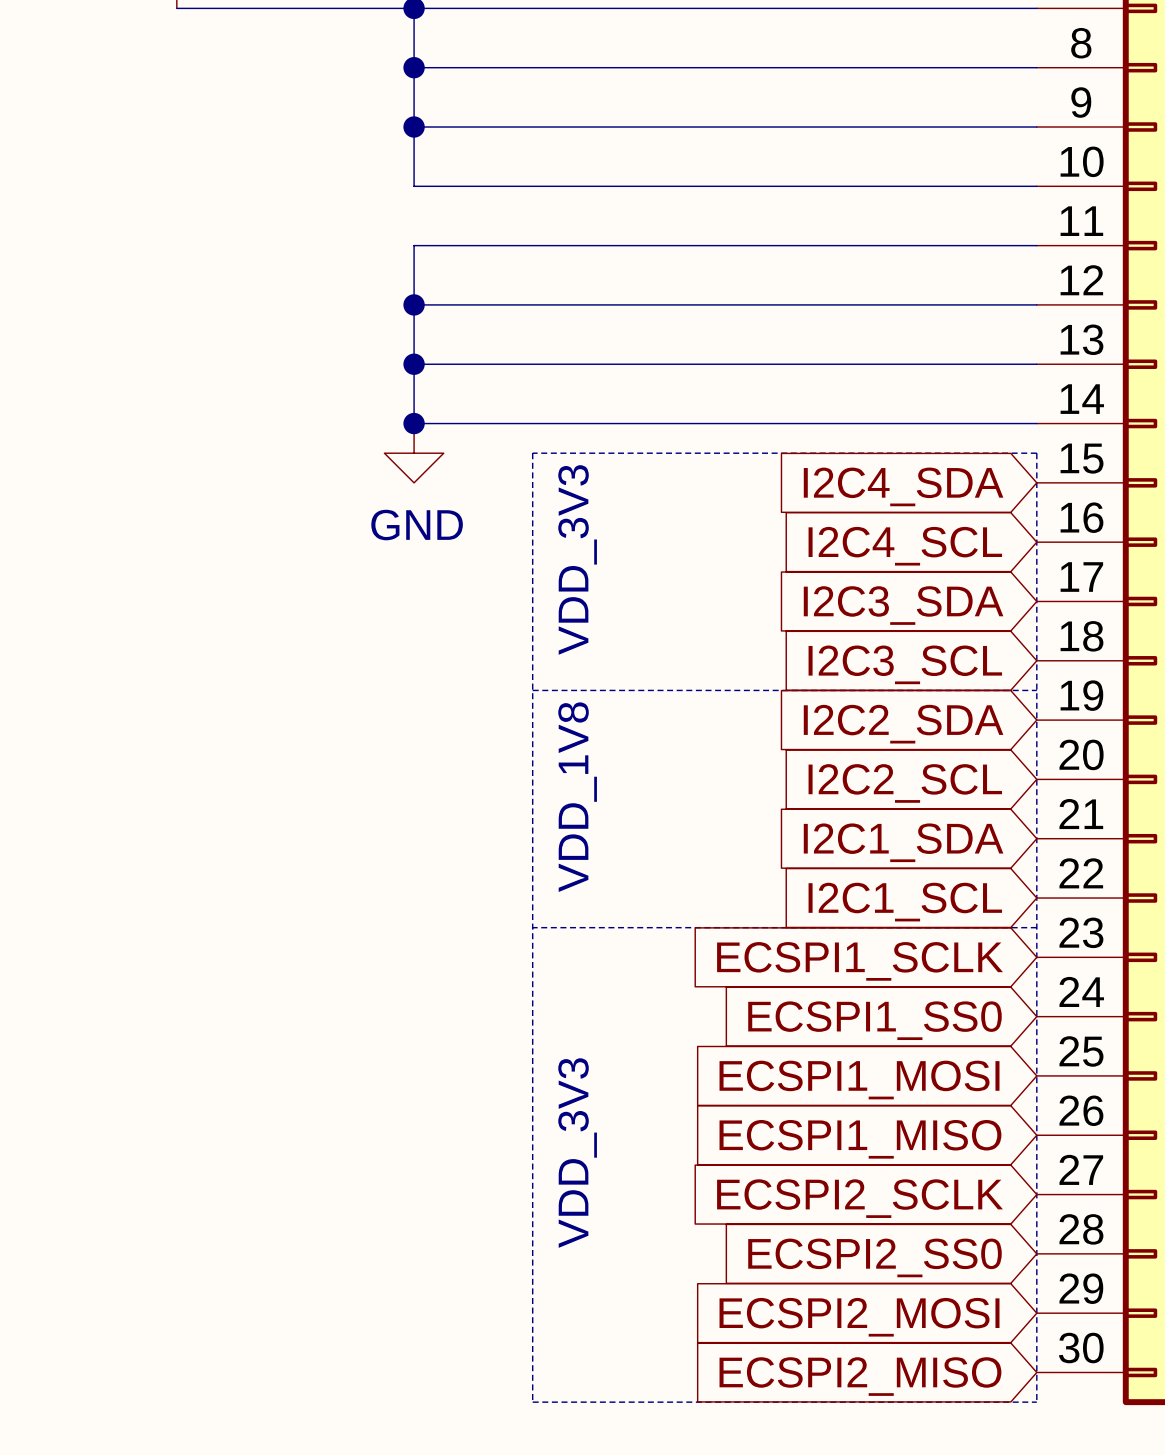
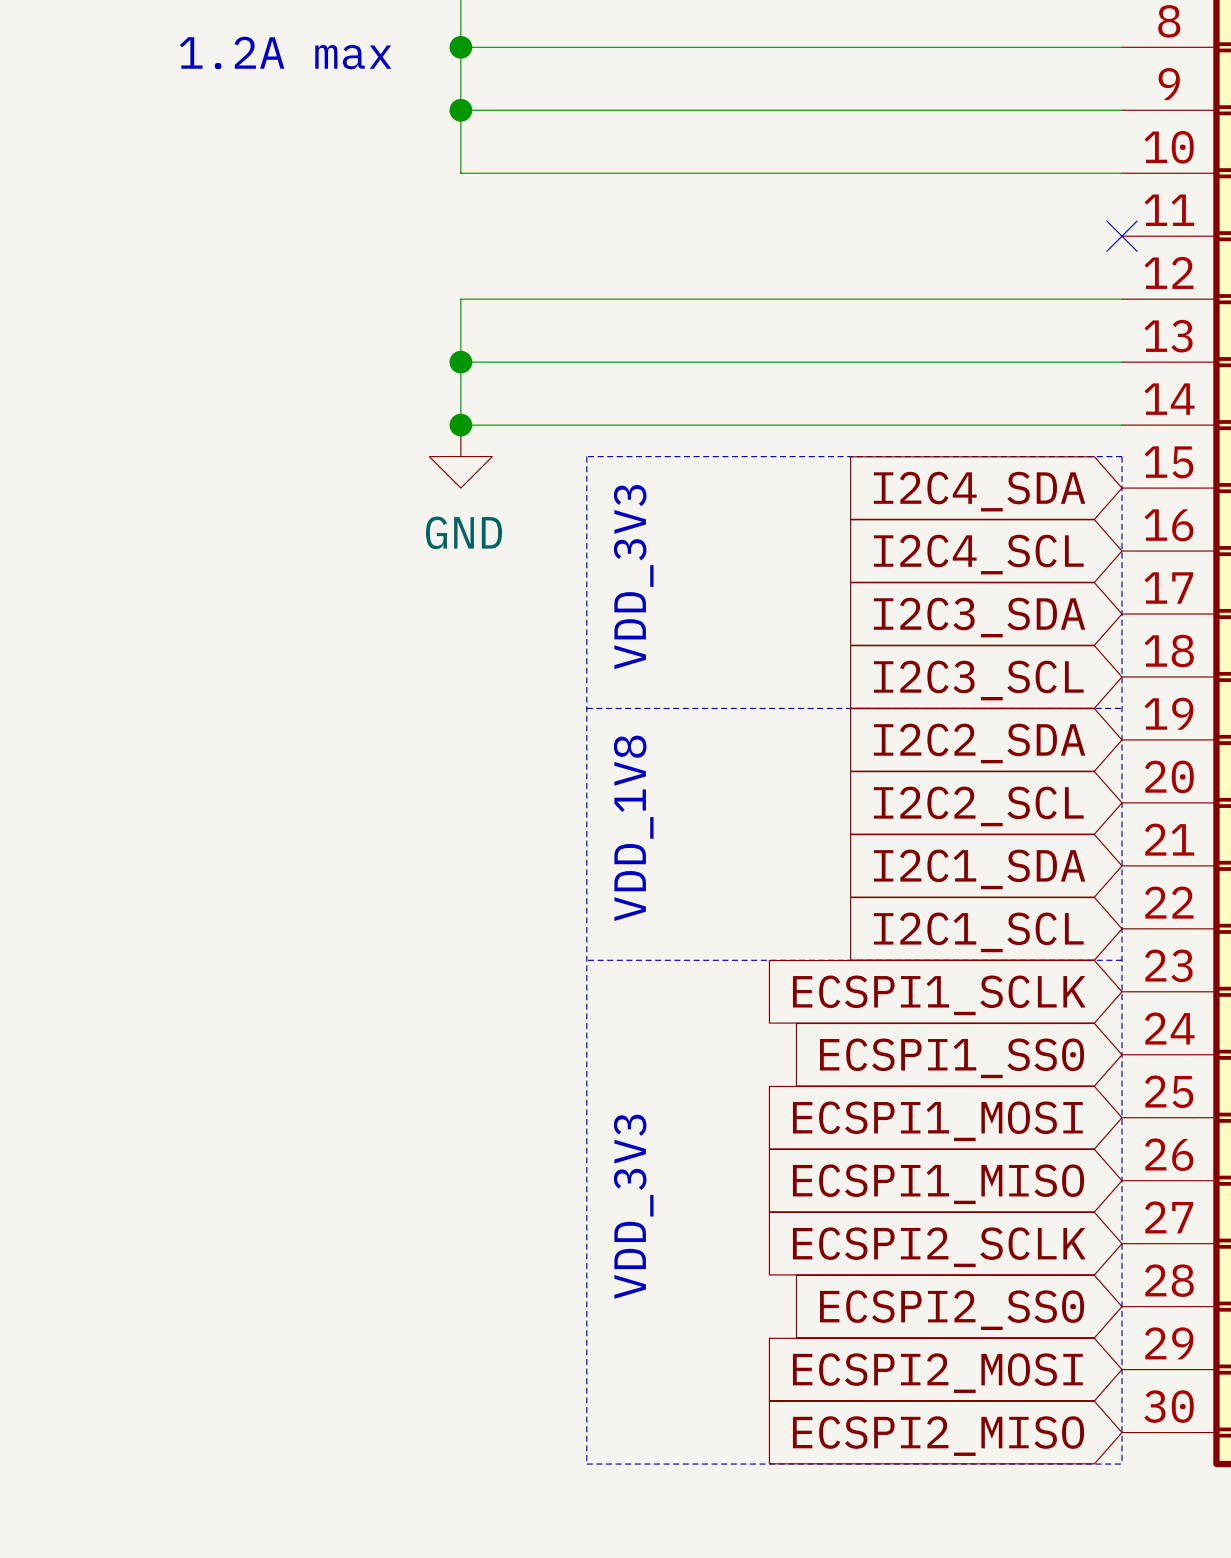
text: none -> 1.2A max (285, 53)
wire: (1036, 245) (414, 245) (414, 304) -> none
no-connect mark: none -> (1122, 236)
junction: (414, 304) -> none

